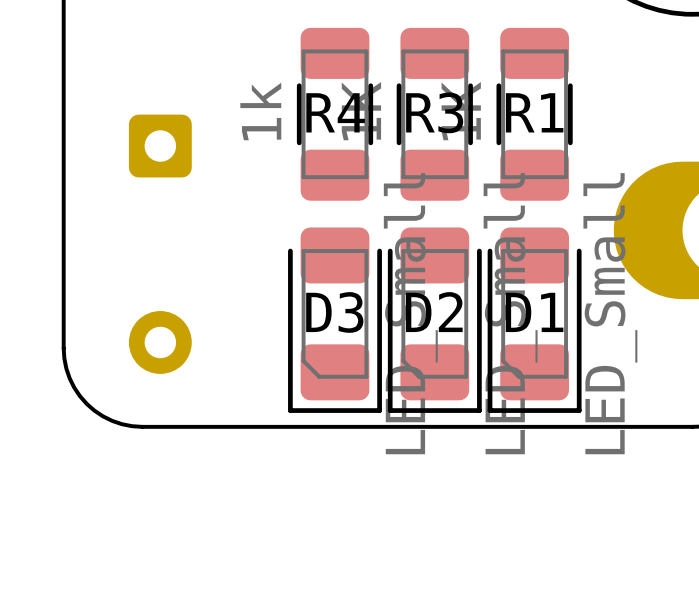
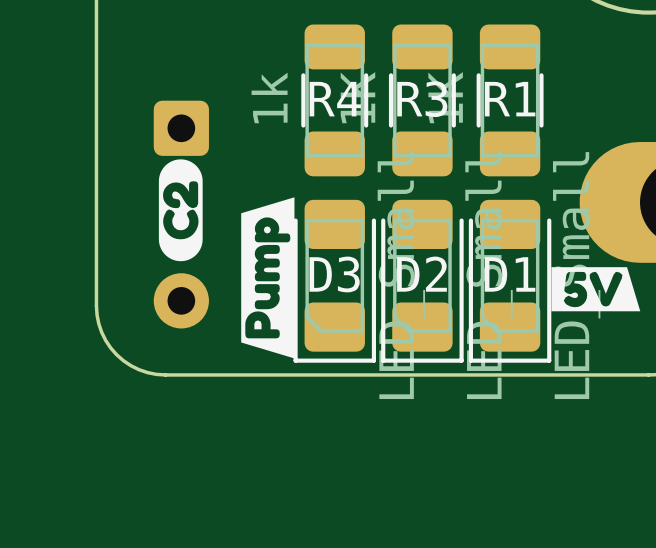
drawing: none -> [158, 159, 295, 359]
drawing: none -> [551, 267, 641, 312]

